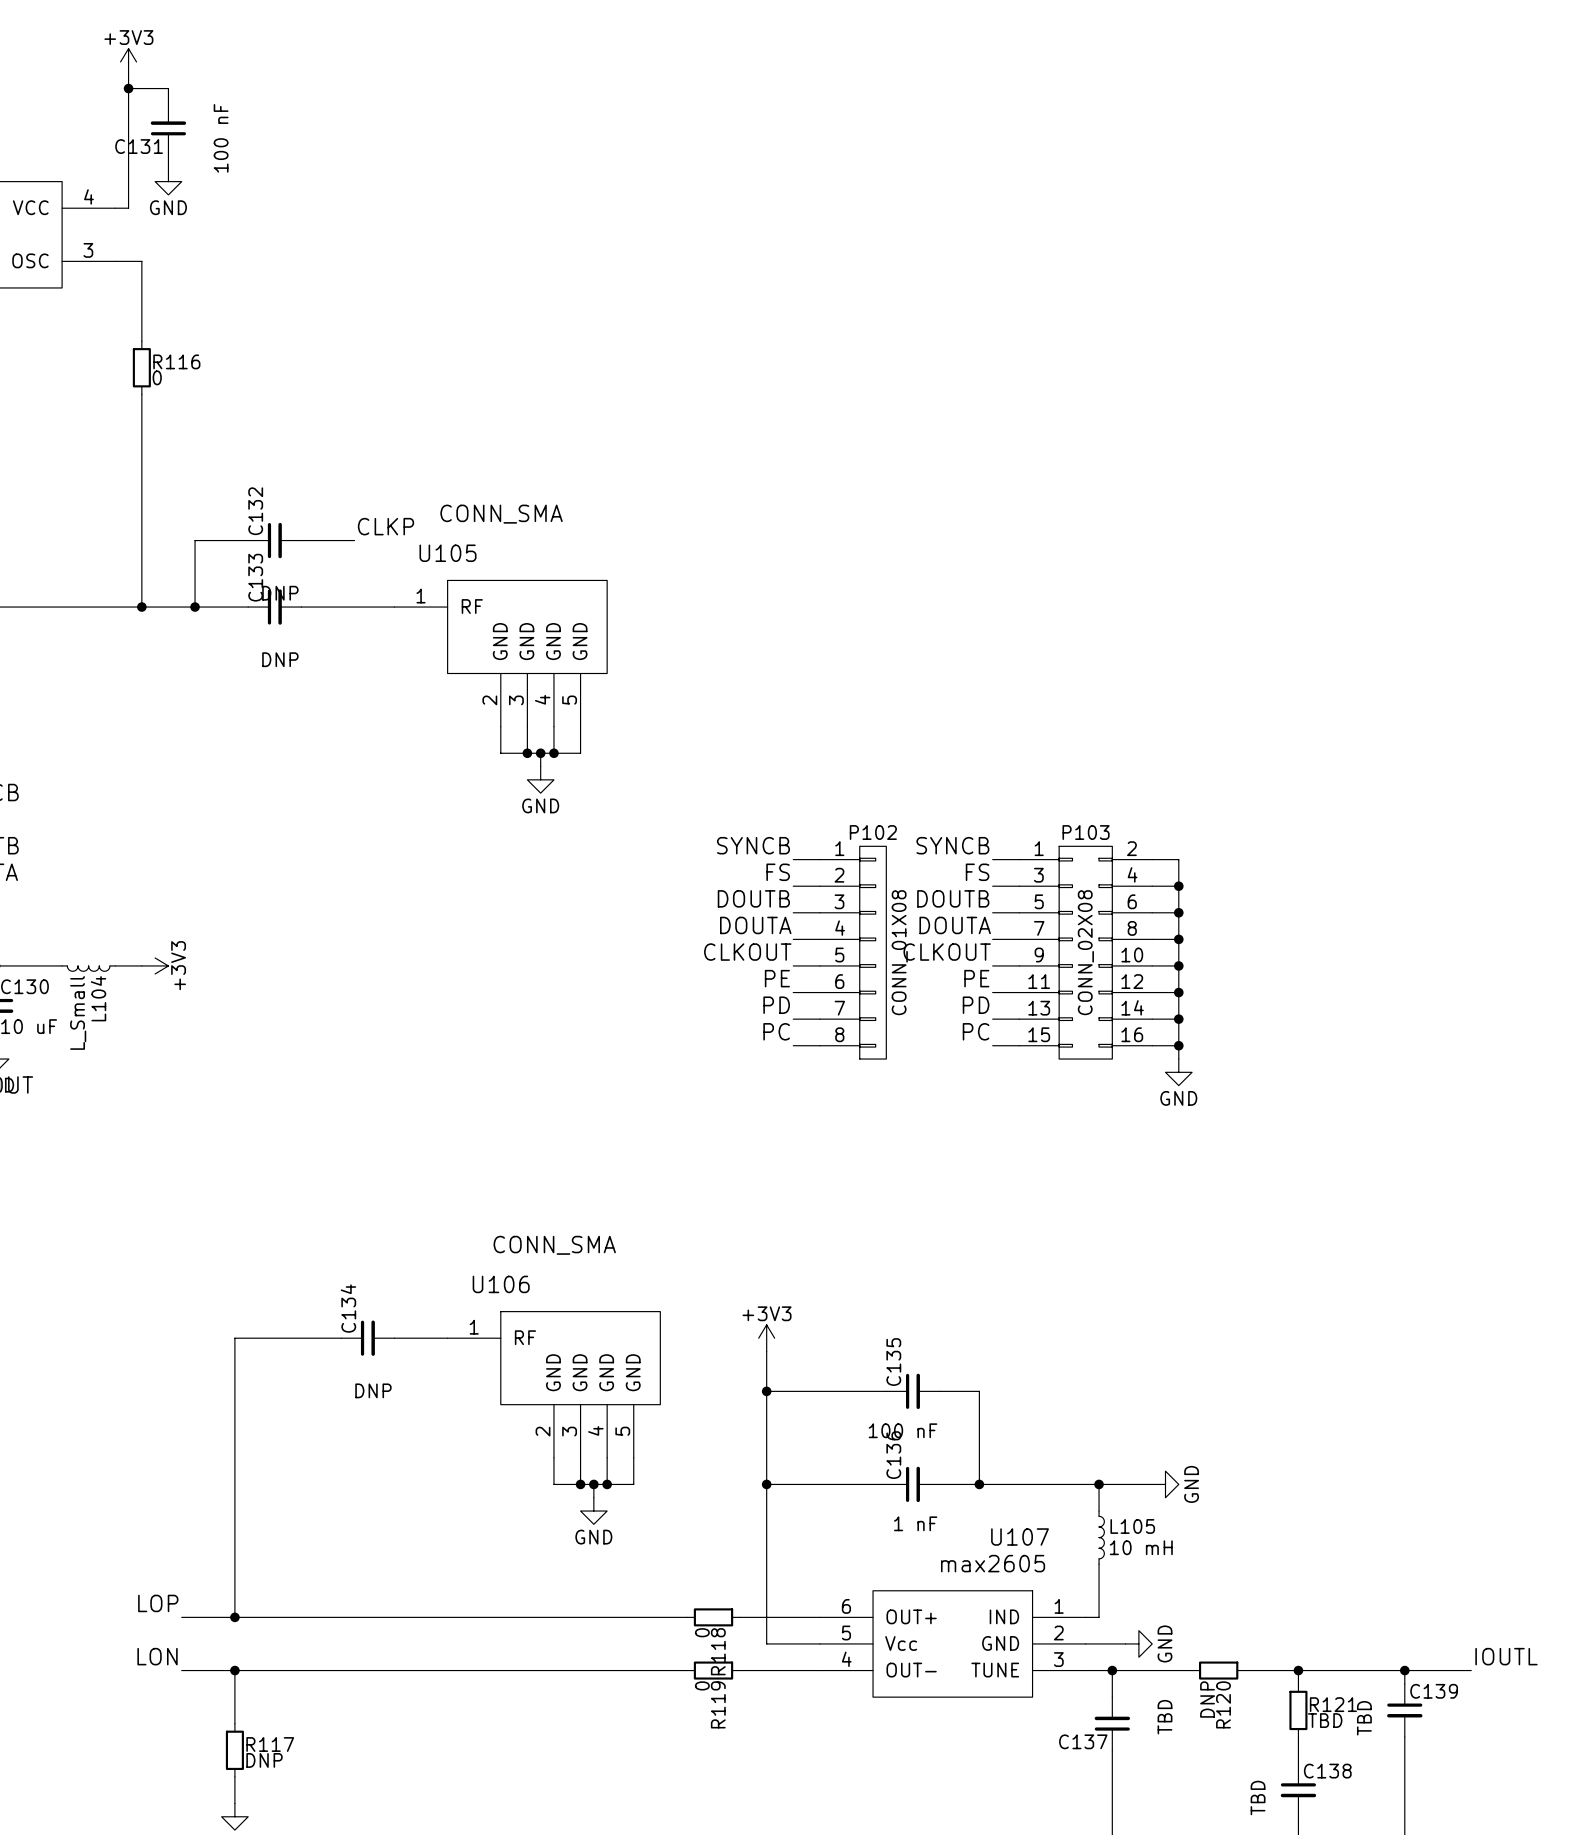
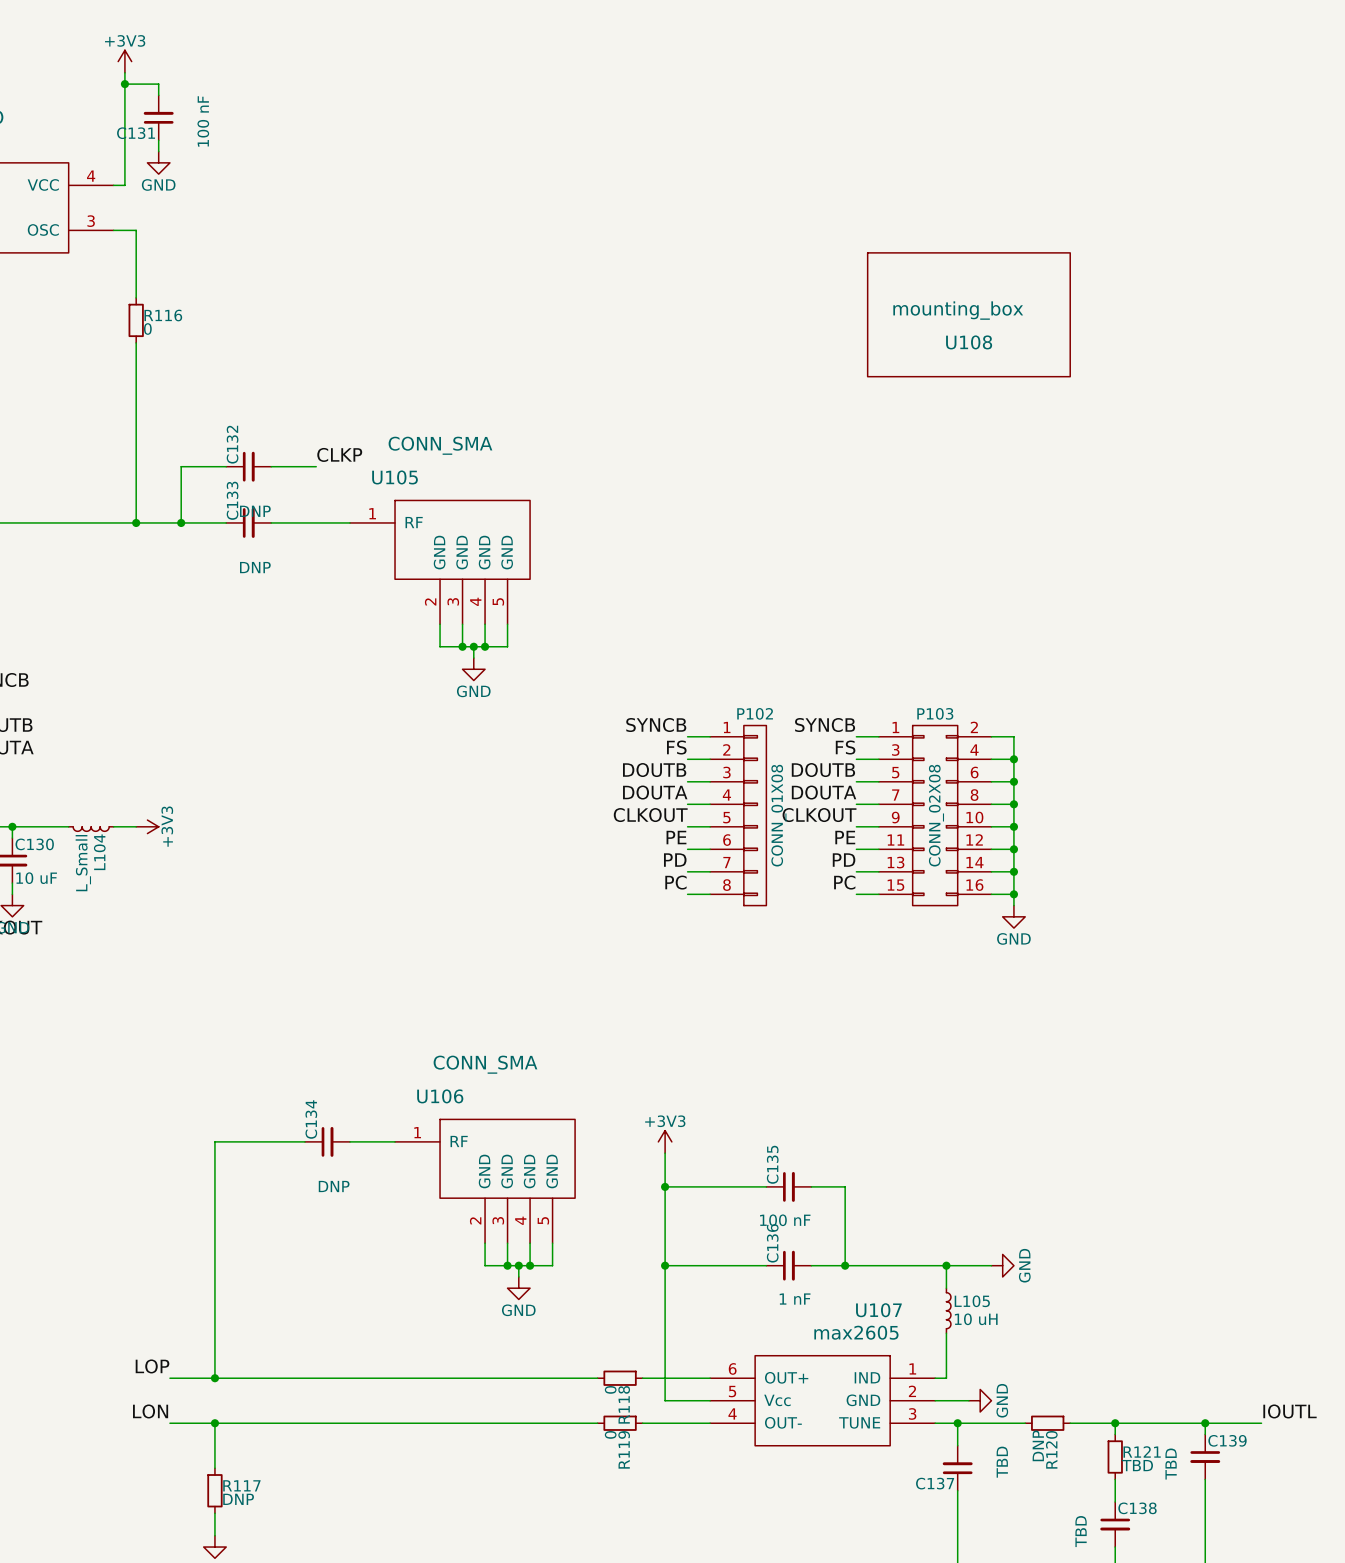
U108: none -> mounting_box (968, 314)
L105 value: 10 mH (1141, 1547) -> 10 uH (976, 1319)

